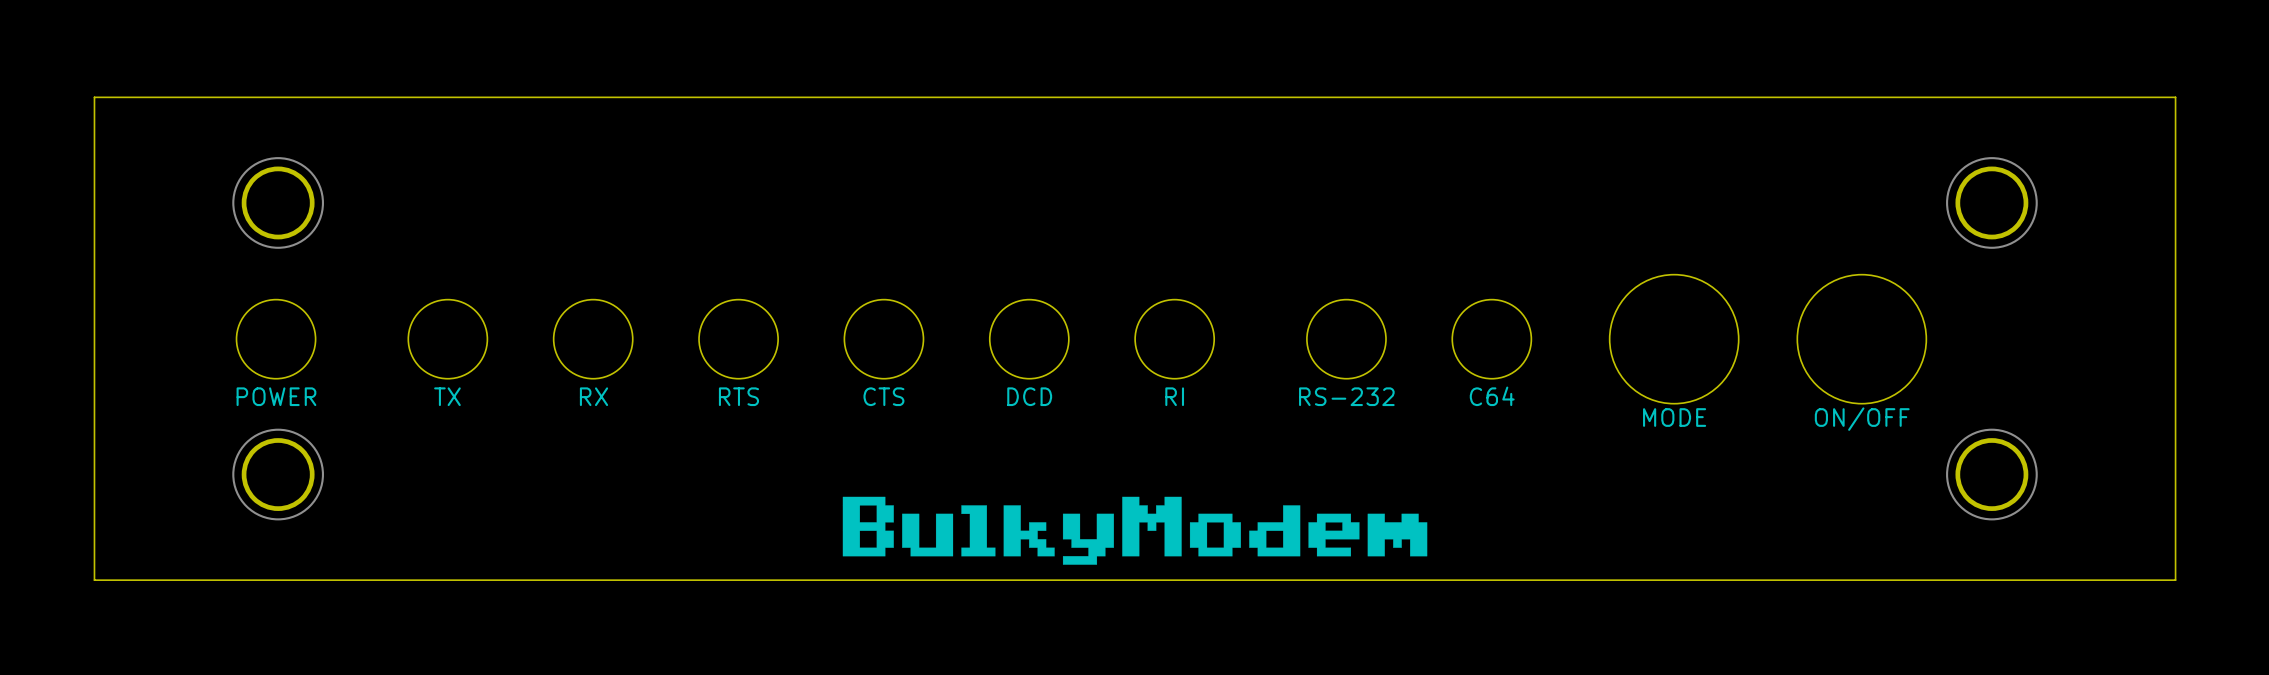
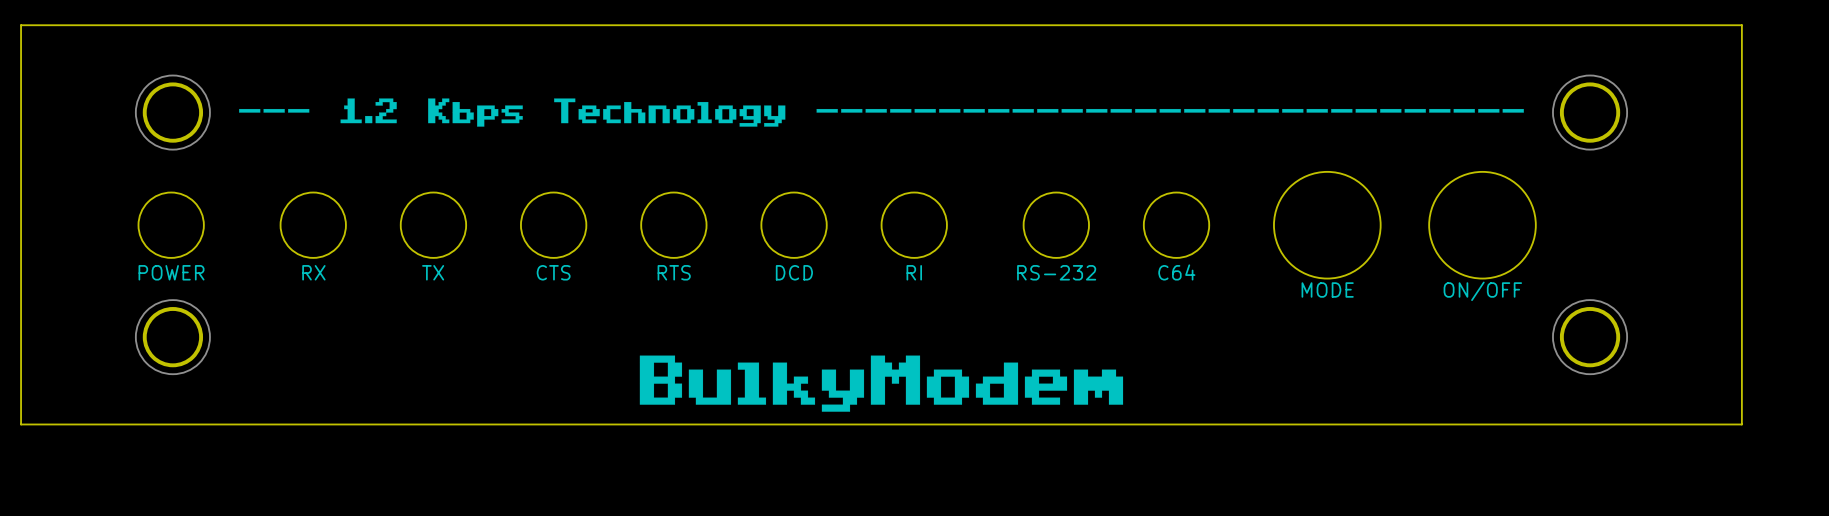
drawing: none -> [239, 98, 1524, 127]
text: TX (447, 396) -> RX (313, 272)
text: RX (594, 396) -> TX (433, 272)
text: RTS (738, 396) -> CTS (553, 272)
text: CTS (883, 396) -> RTS (674, 272)

